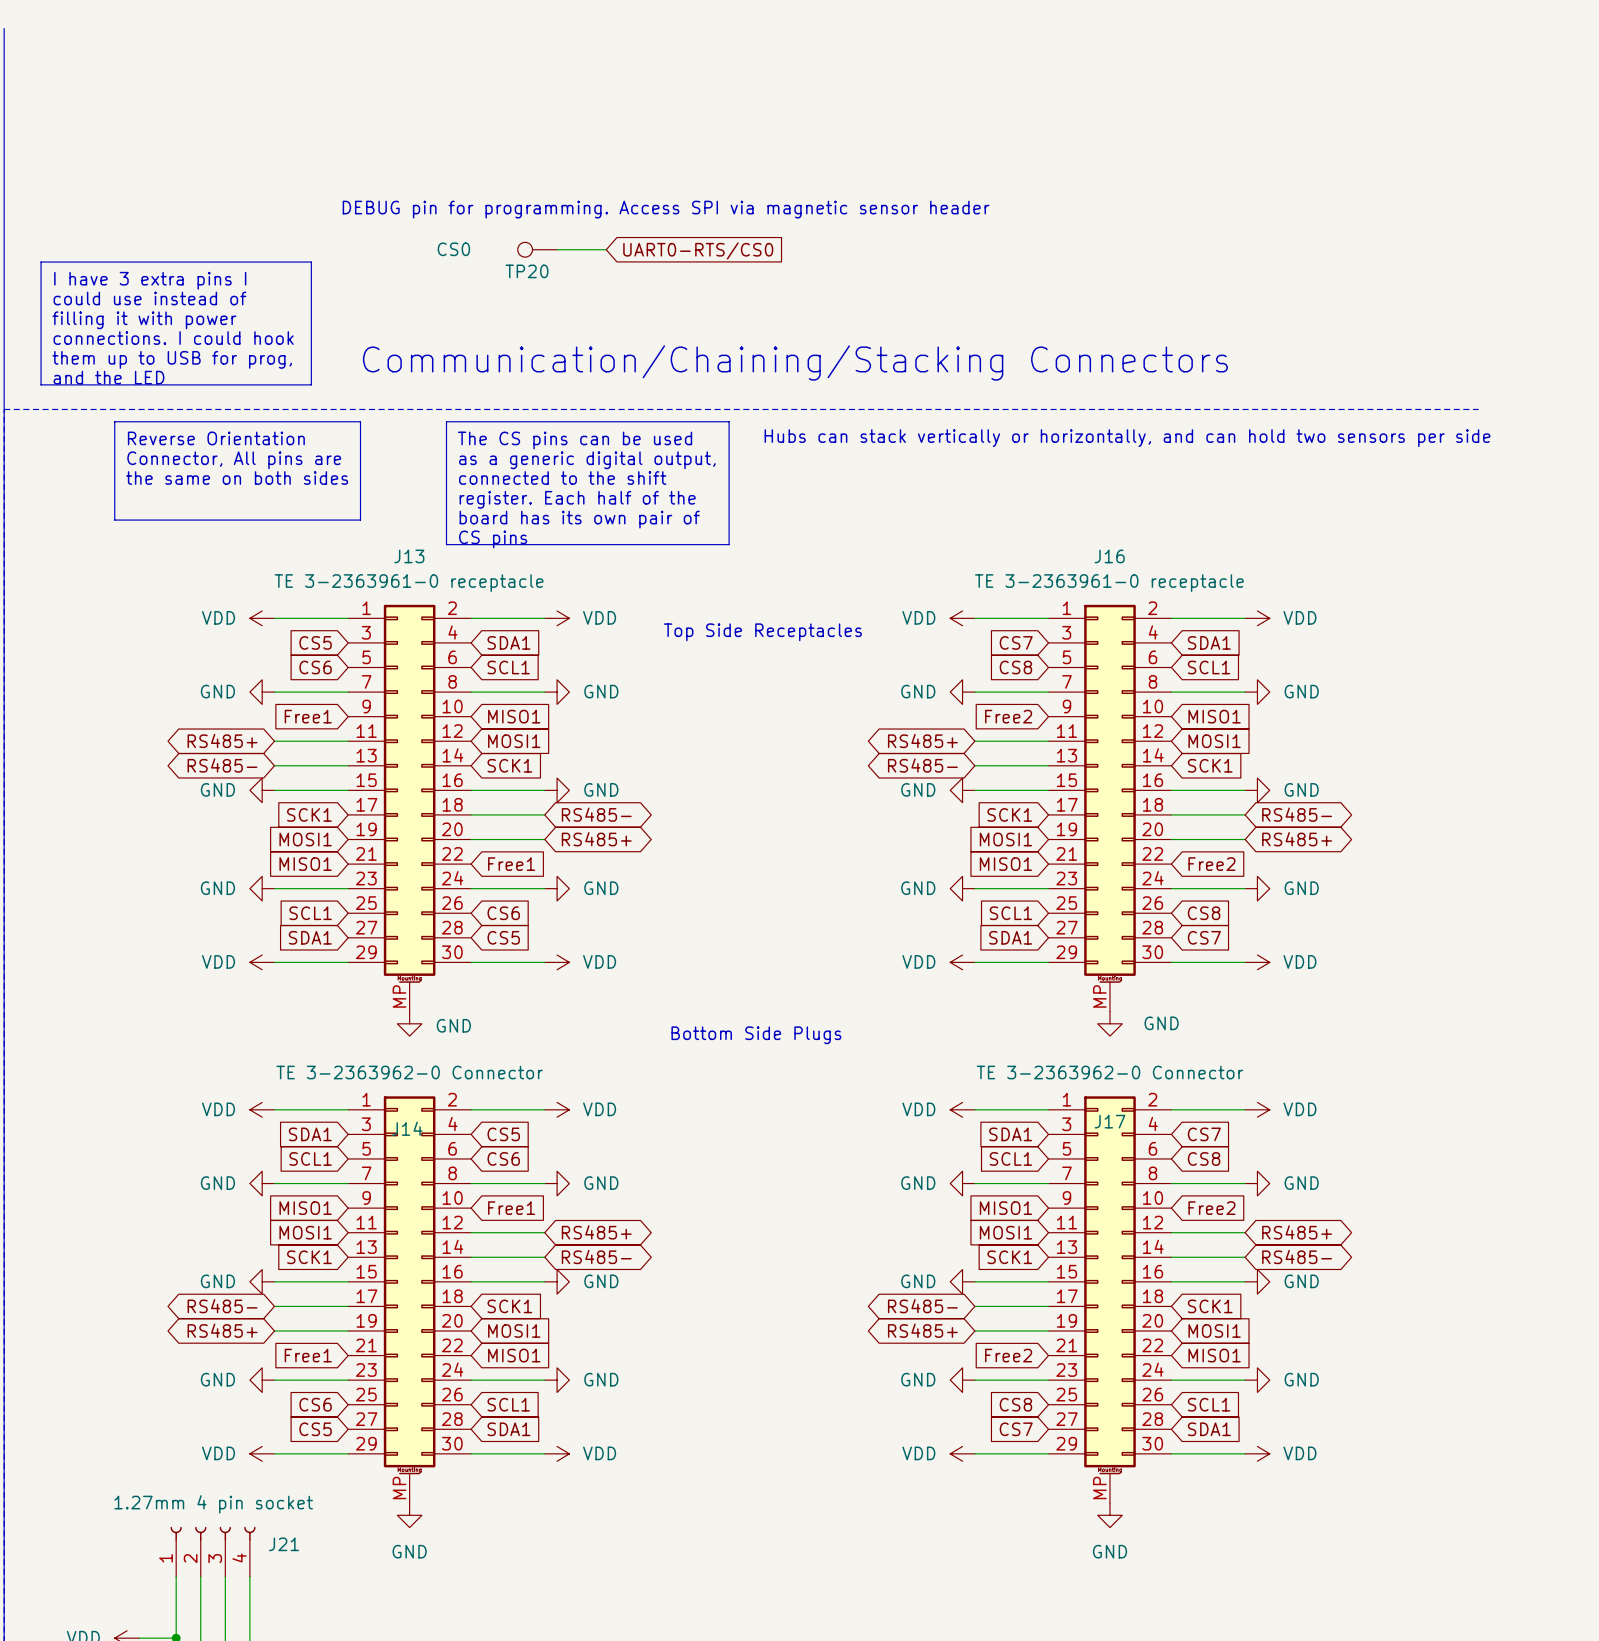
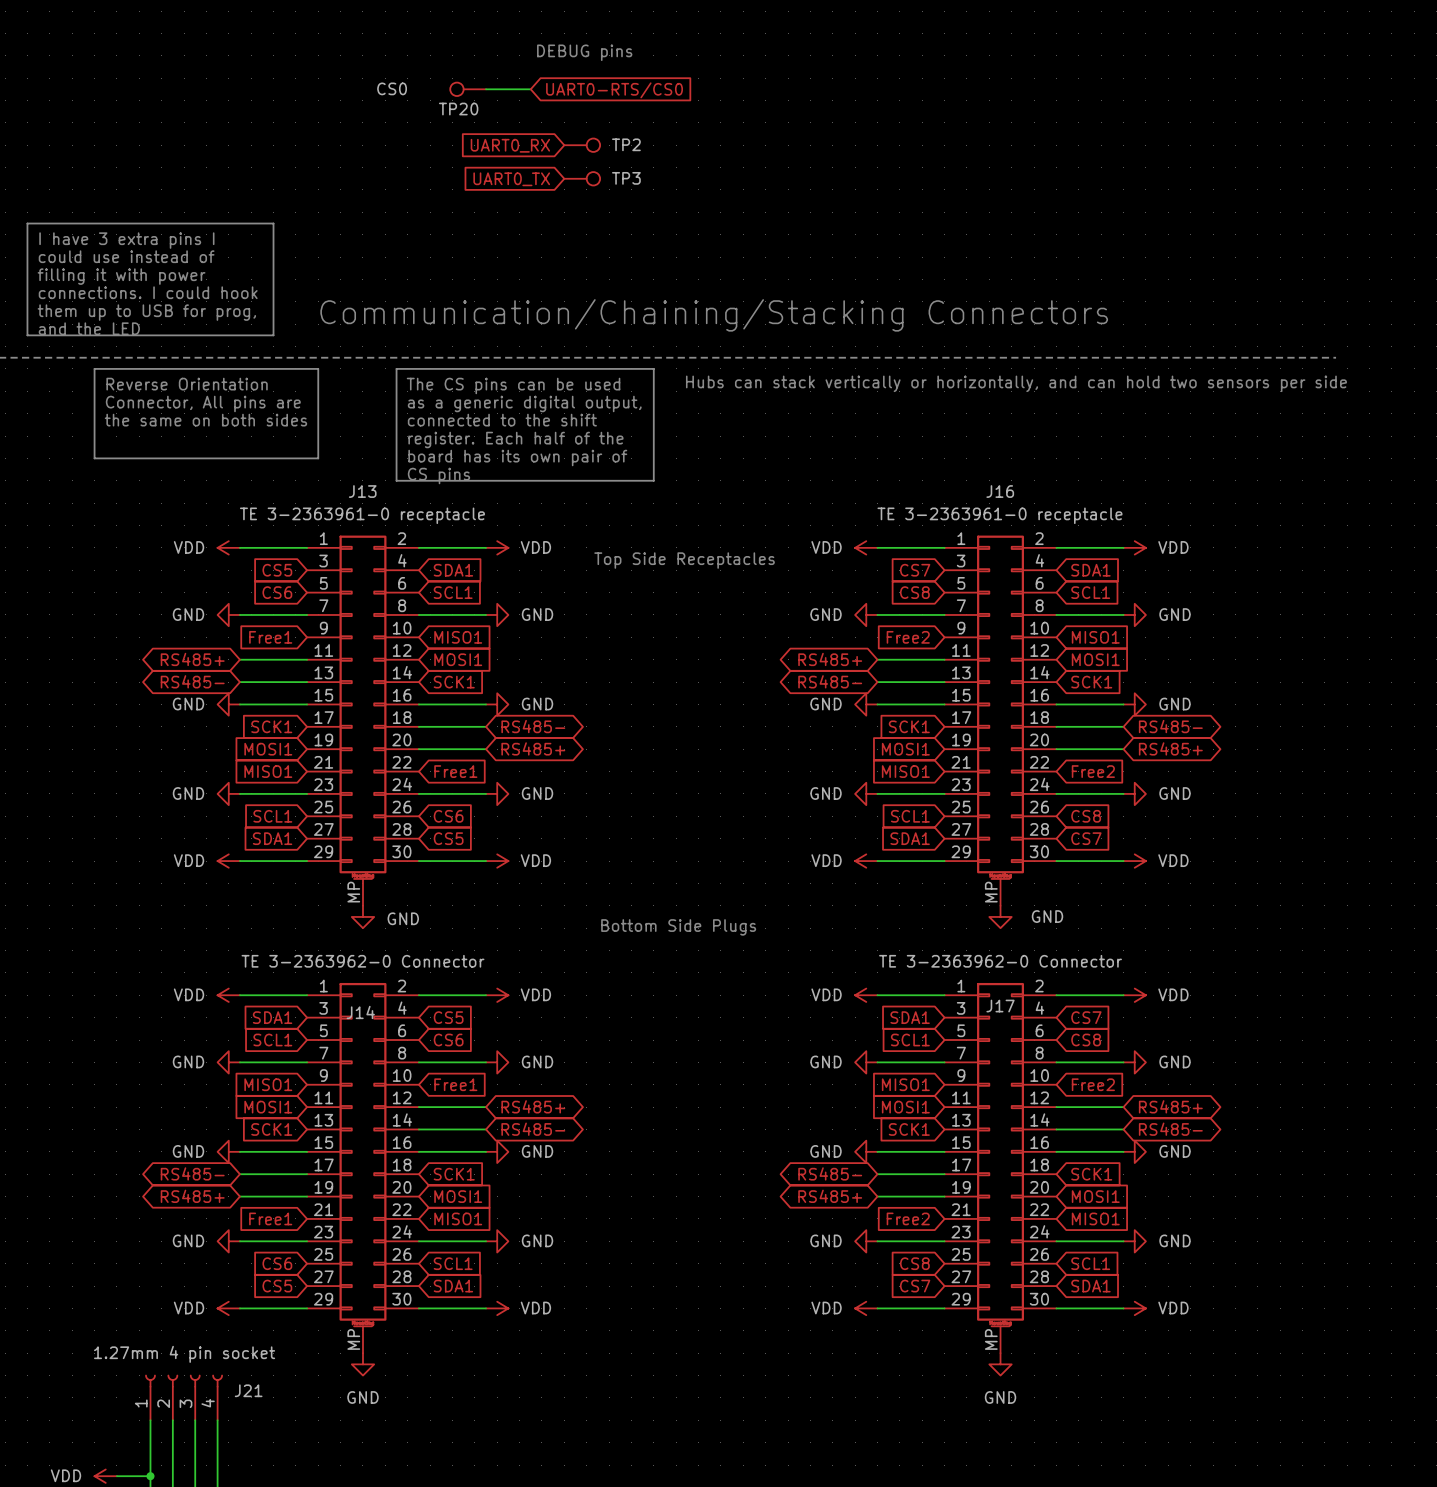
text: none -> DEBUG pins (584, 52)
global label: none -> UART0_RX (510, 145)
TP2: none -> (582, 145)
text: DEBUG pin for programming. Access SPI via magnetic sensor header (666, 209) -> none
TP3: none -> (582, 178)
global label: none -> UART0_TX (511, 179)
TP20 position: (537, 249) -> (468, 89)
wire: (557, 249) (606, 249) -> (486, 89) (530, 89)
global label position: UART0-RTS/CS0 (698, 250) -> UART0-RTS/CS0 (614, 90)

